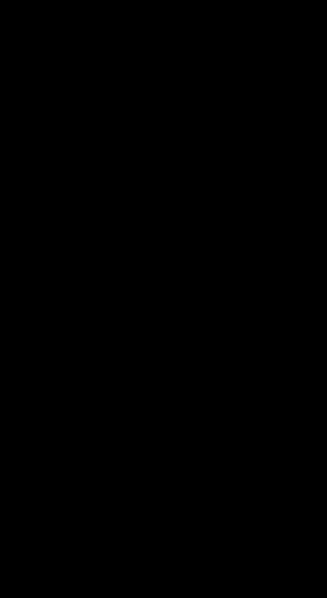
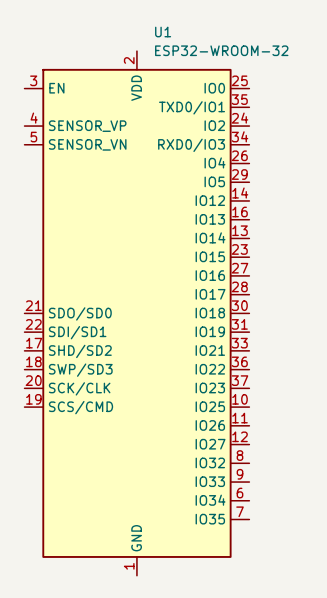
U1: none -> ESP32-WROOM-32 (136, 313)

